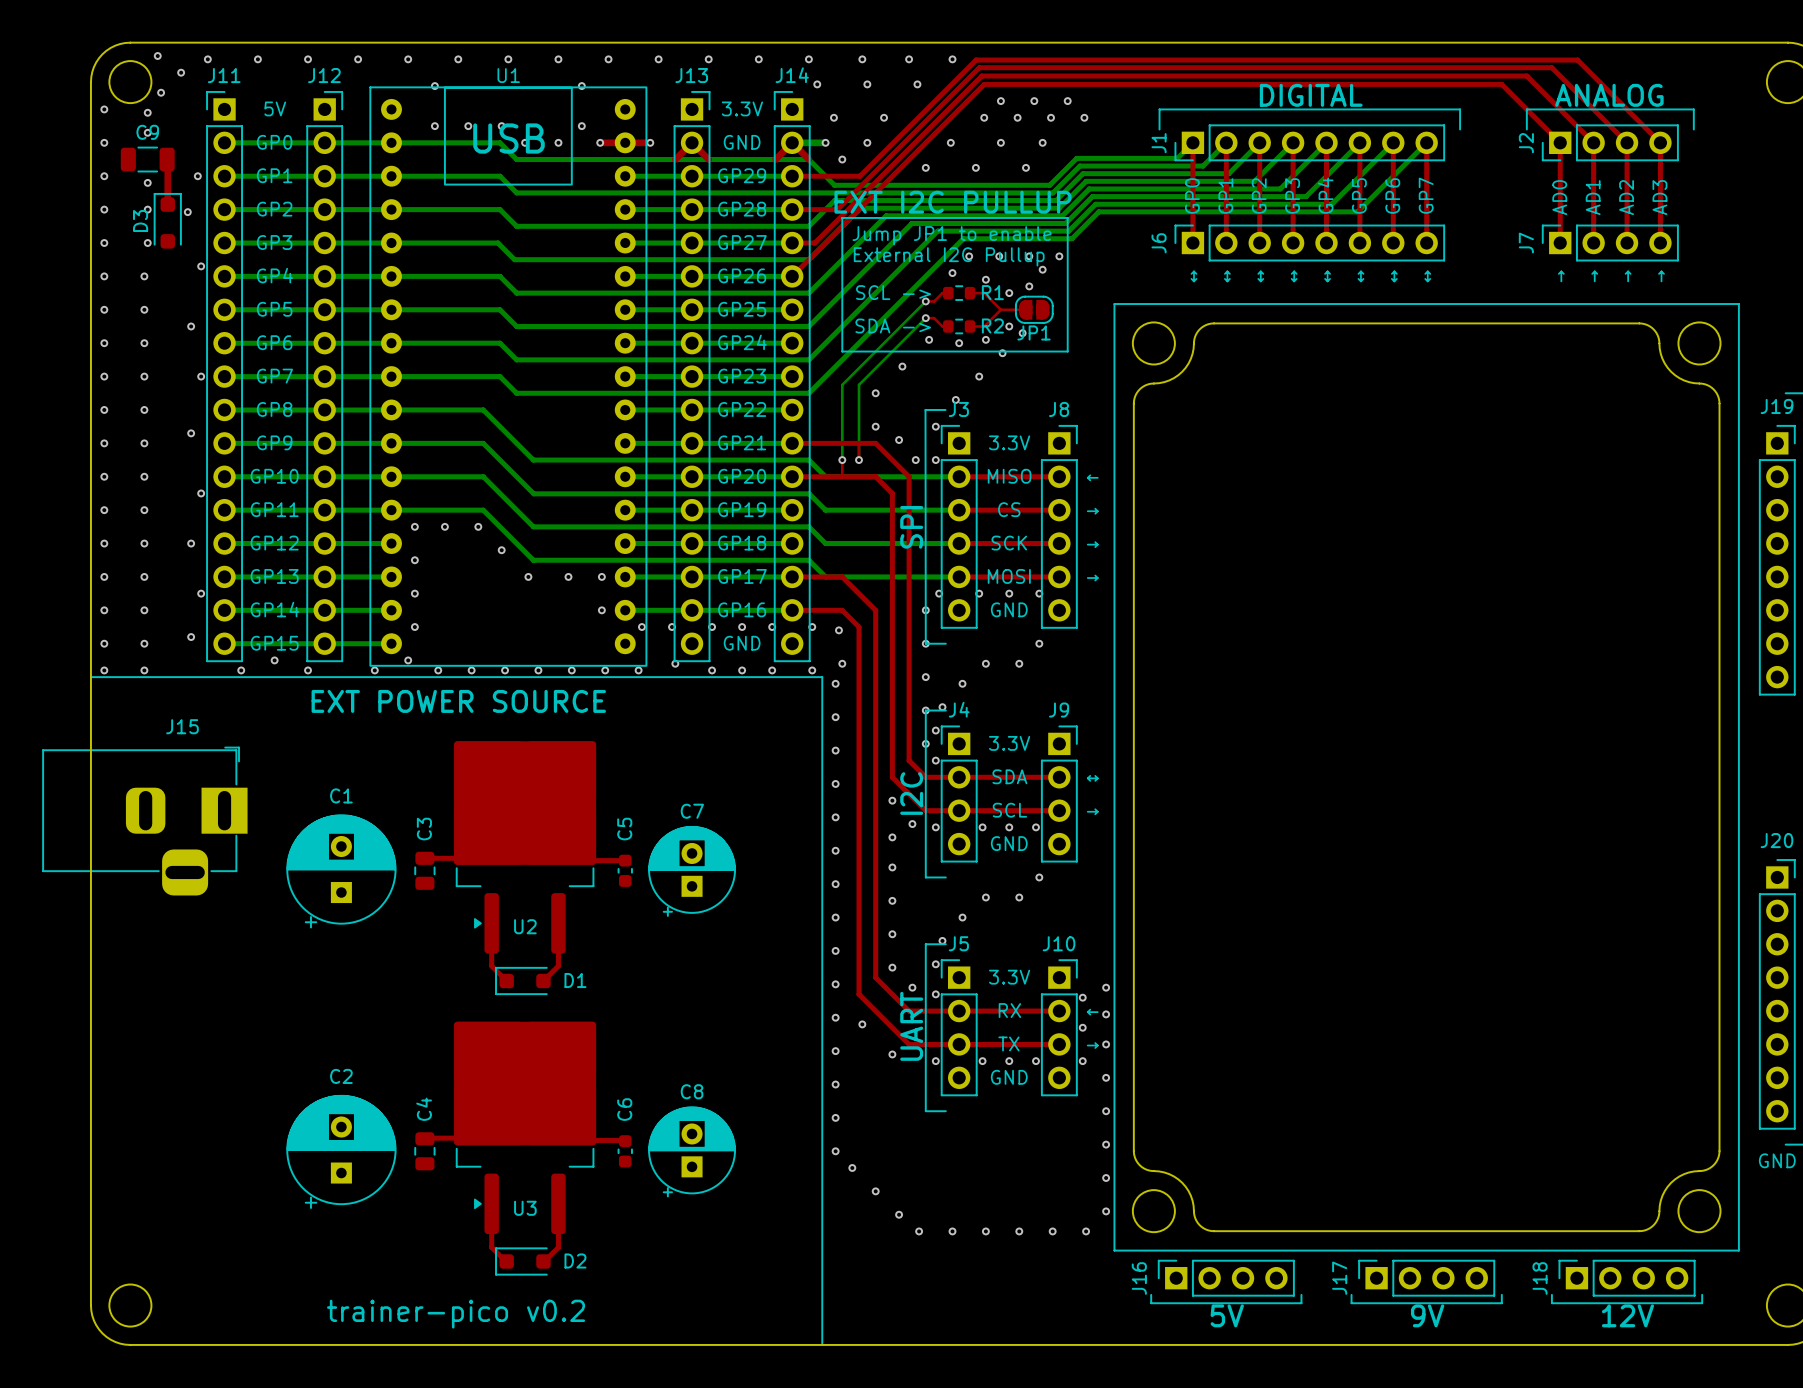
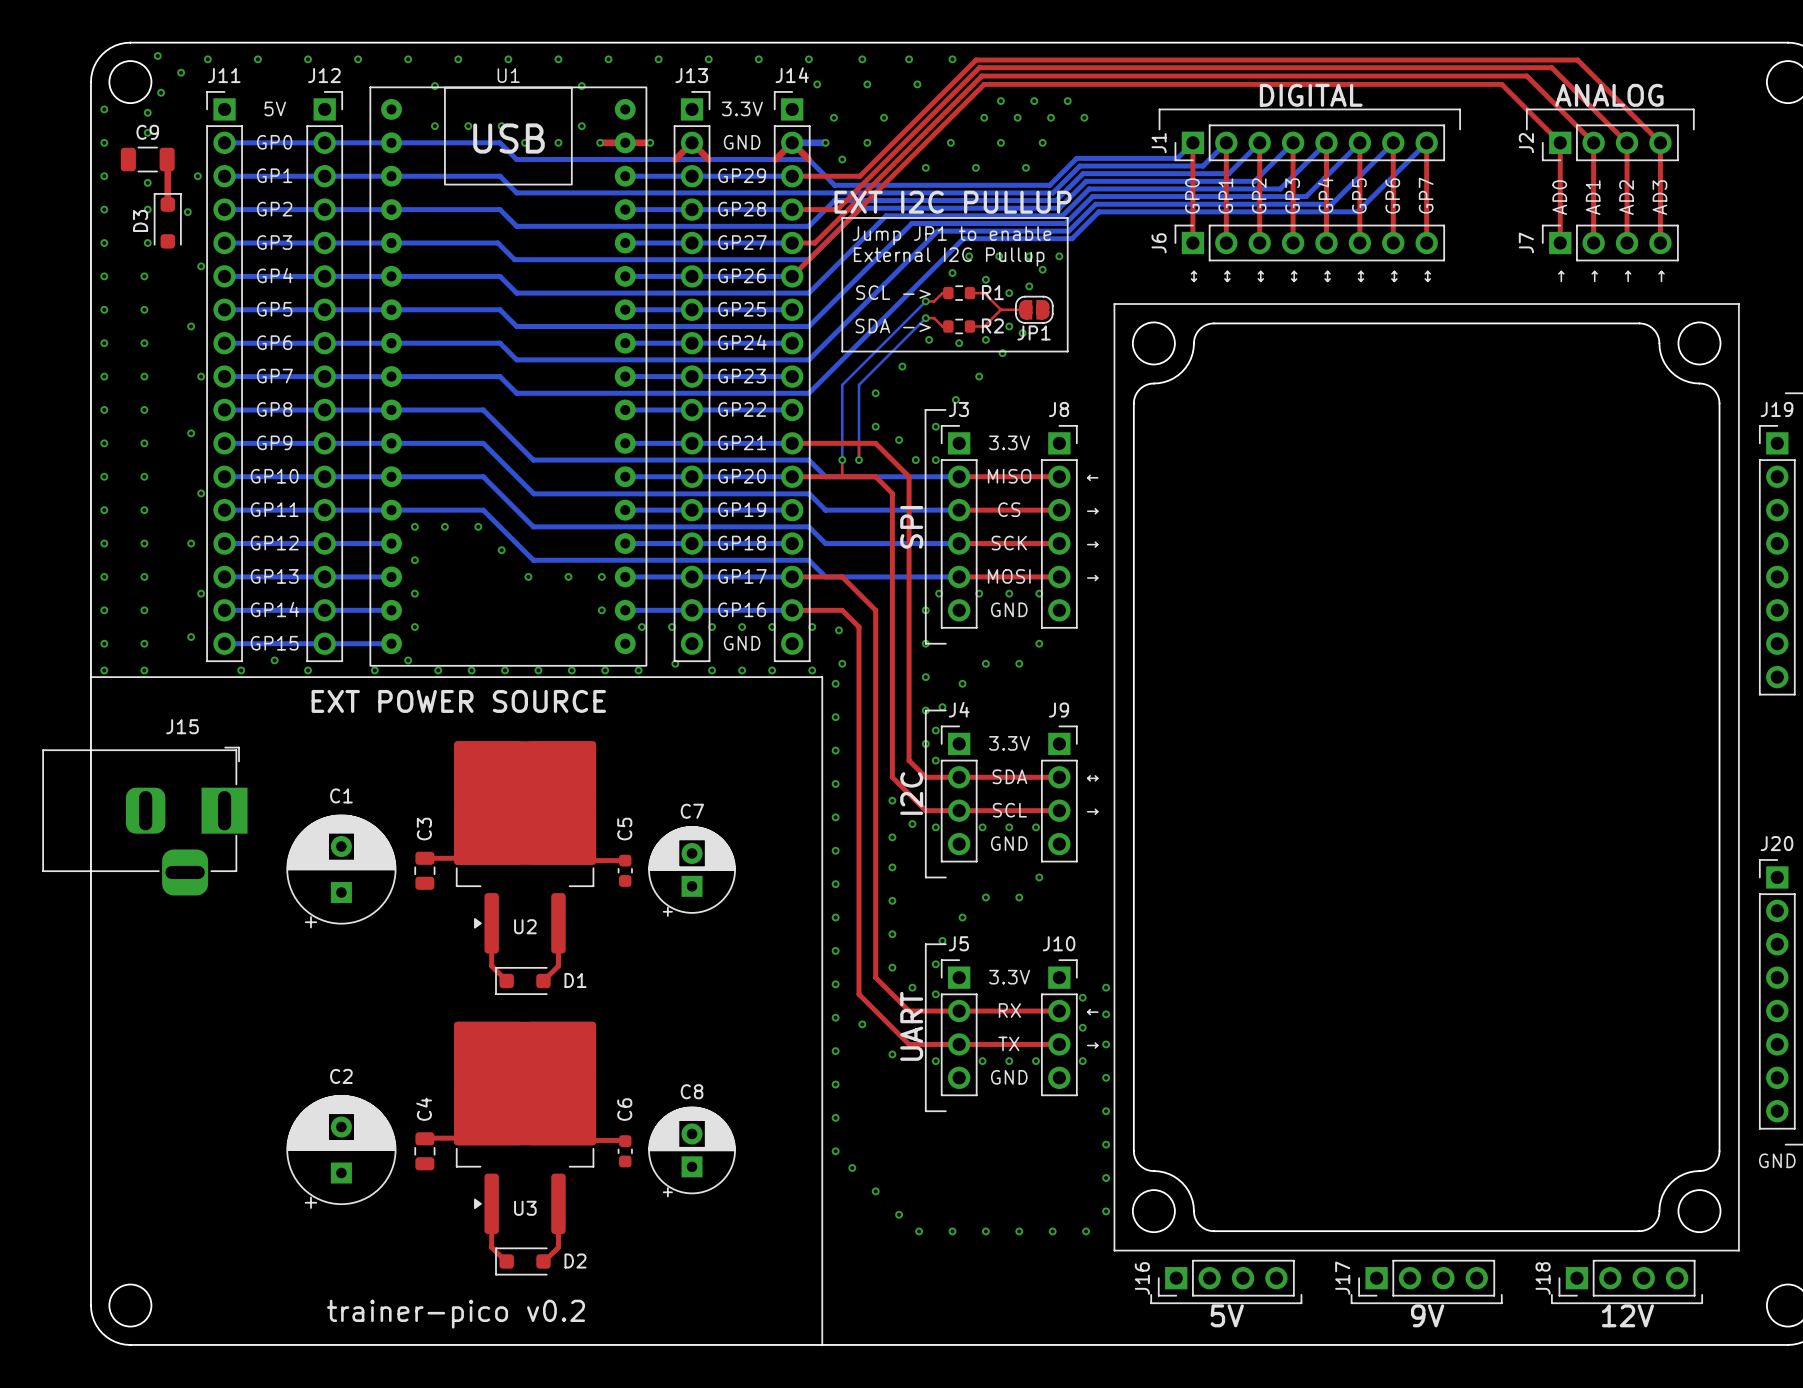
J19 footprint: [1759, 425, 1796, 696] -> [1759, 425, 1796, 696]
J20 footprint: [1759, 859, 1796, 1130] -> [1759, 859, 1796, 1130]
J16 footprint: [1157, 1259, 1295, 1297] -> [1157, 1259, 1295, 1297]
J17 footprint: [1358, 1259, 1496, 1297] -> [1358, 1259, 1496, 1297]
J18 footprint: [1558, 1259, 1696, 1297] -> [1558, 1259, 1696, 1297]

